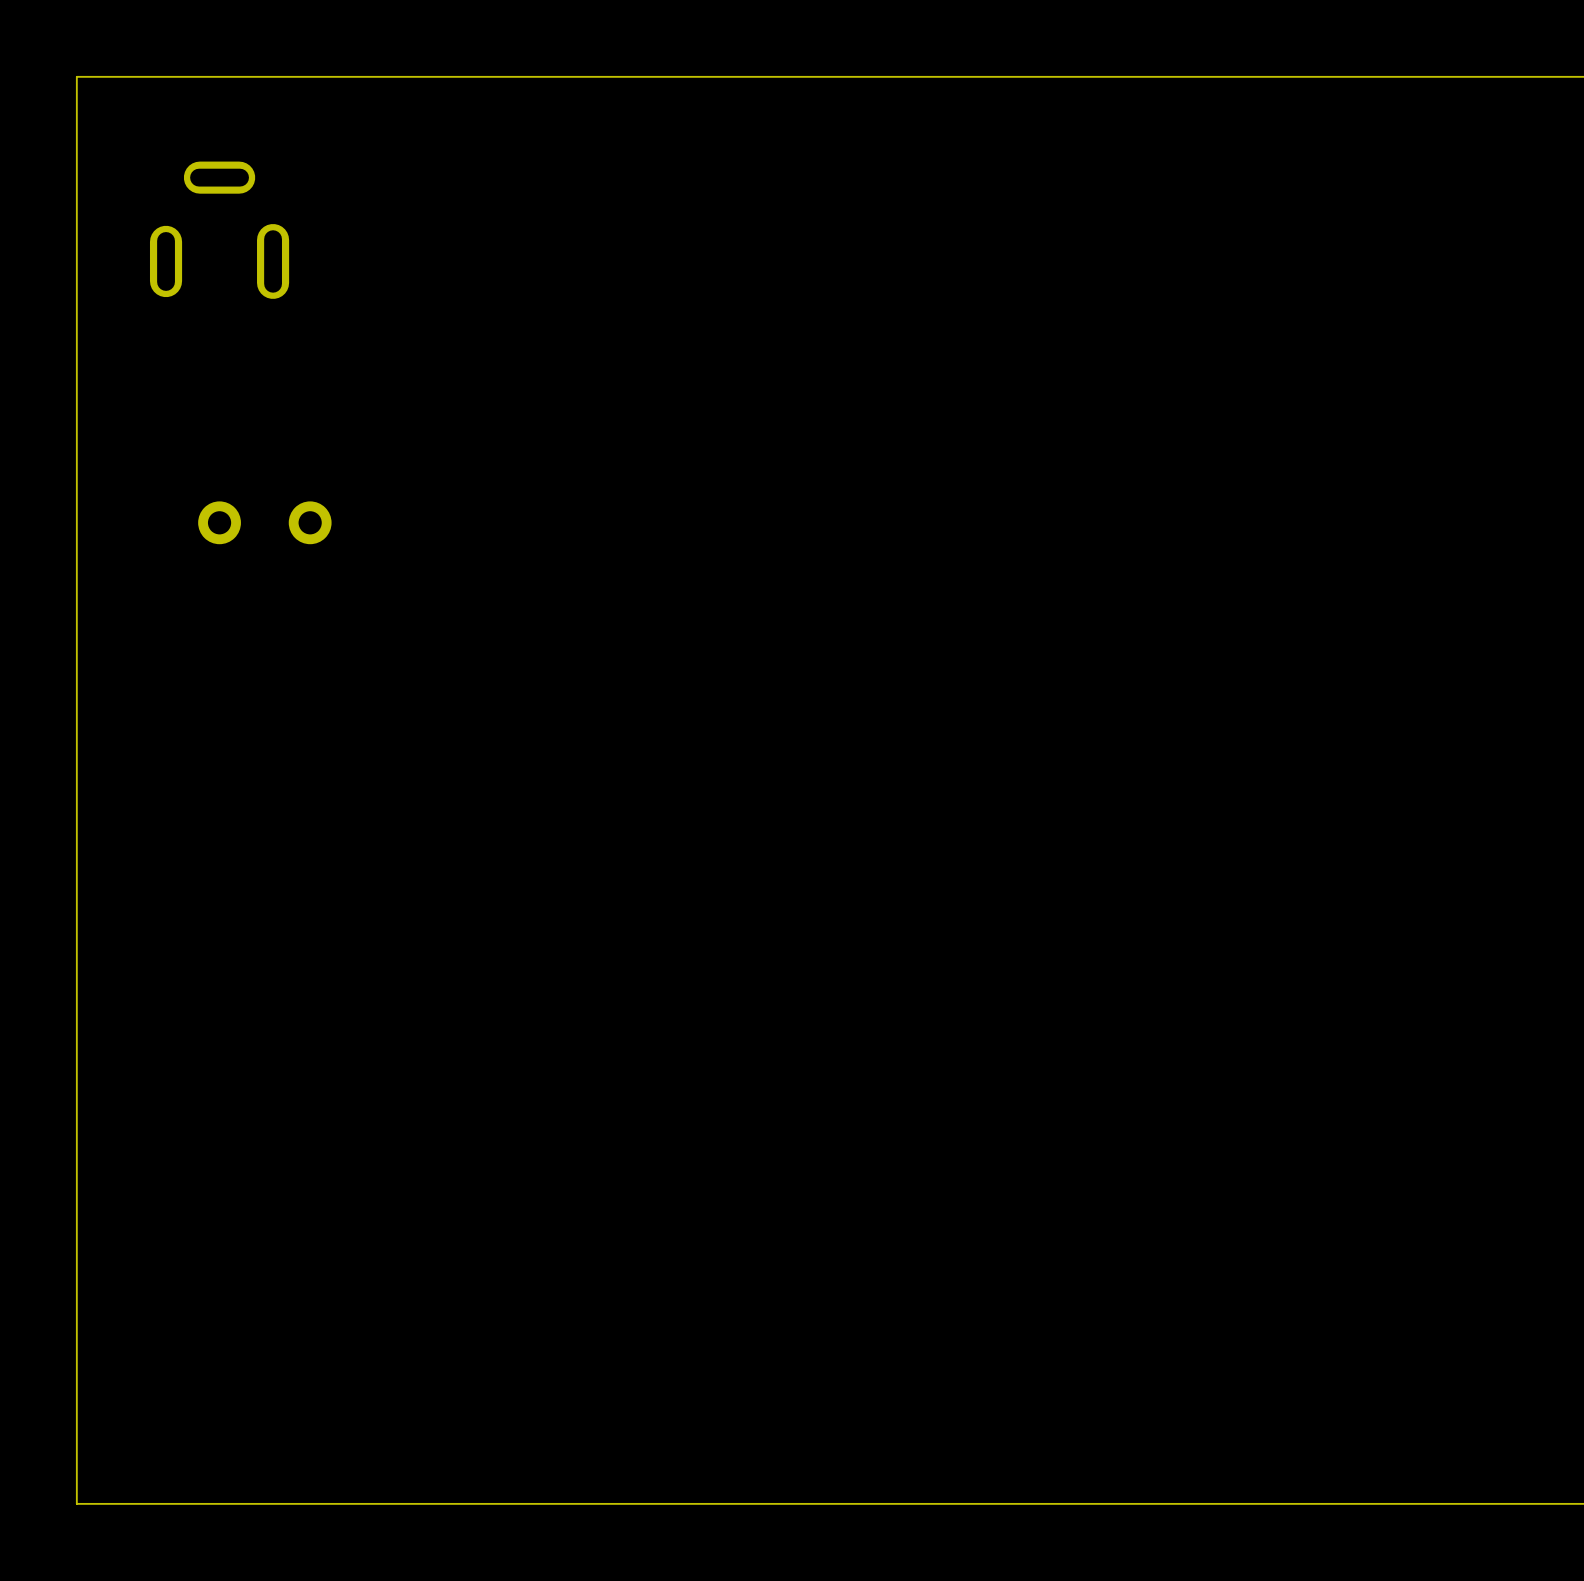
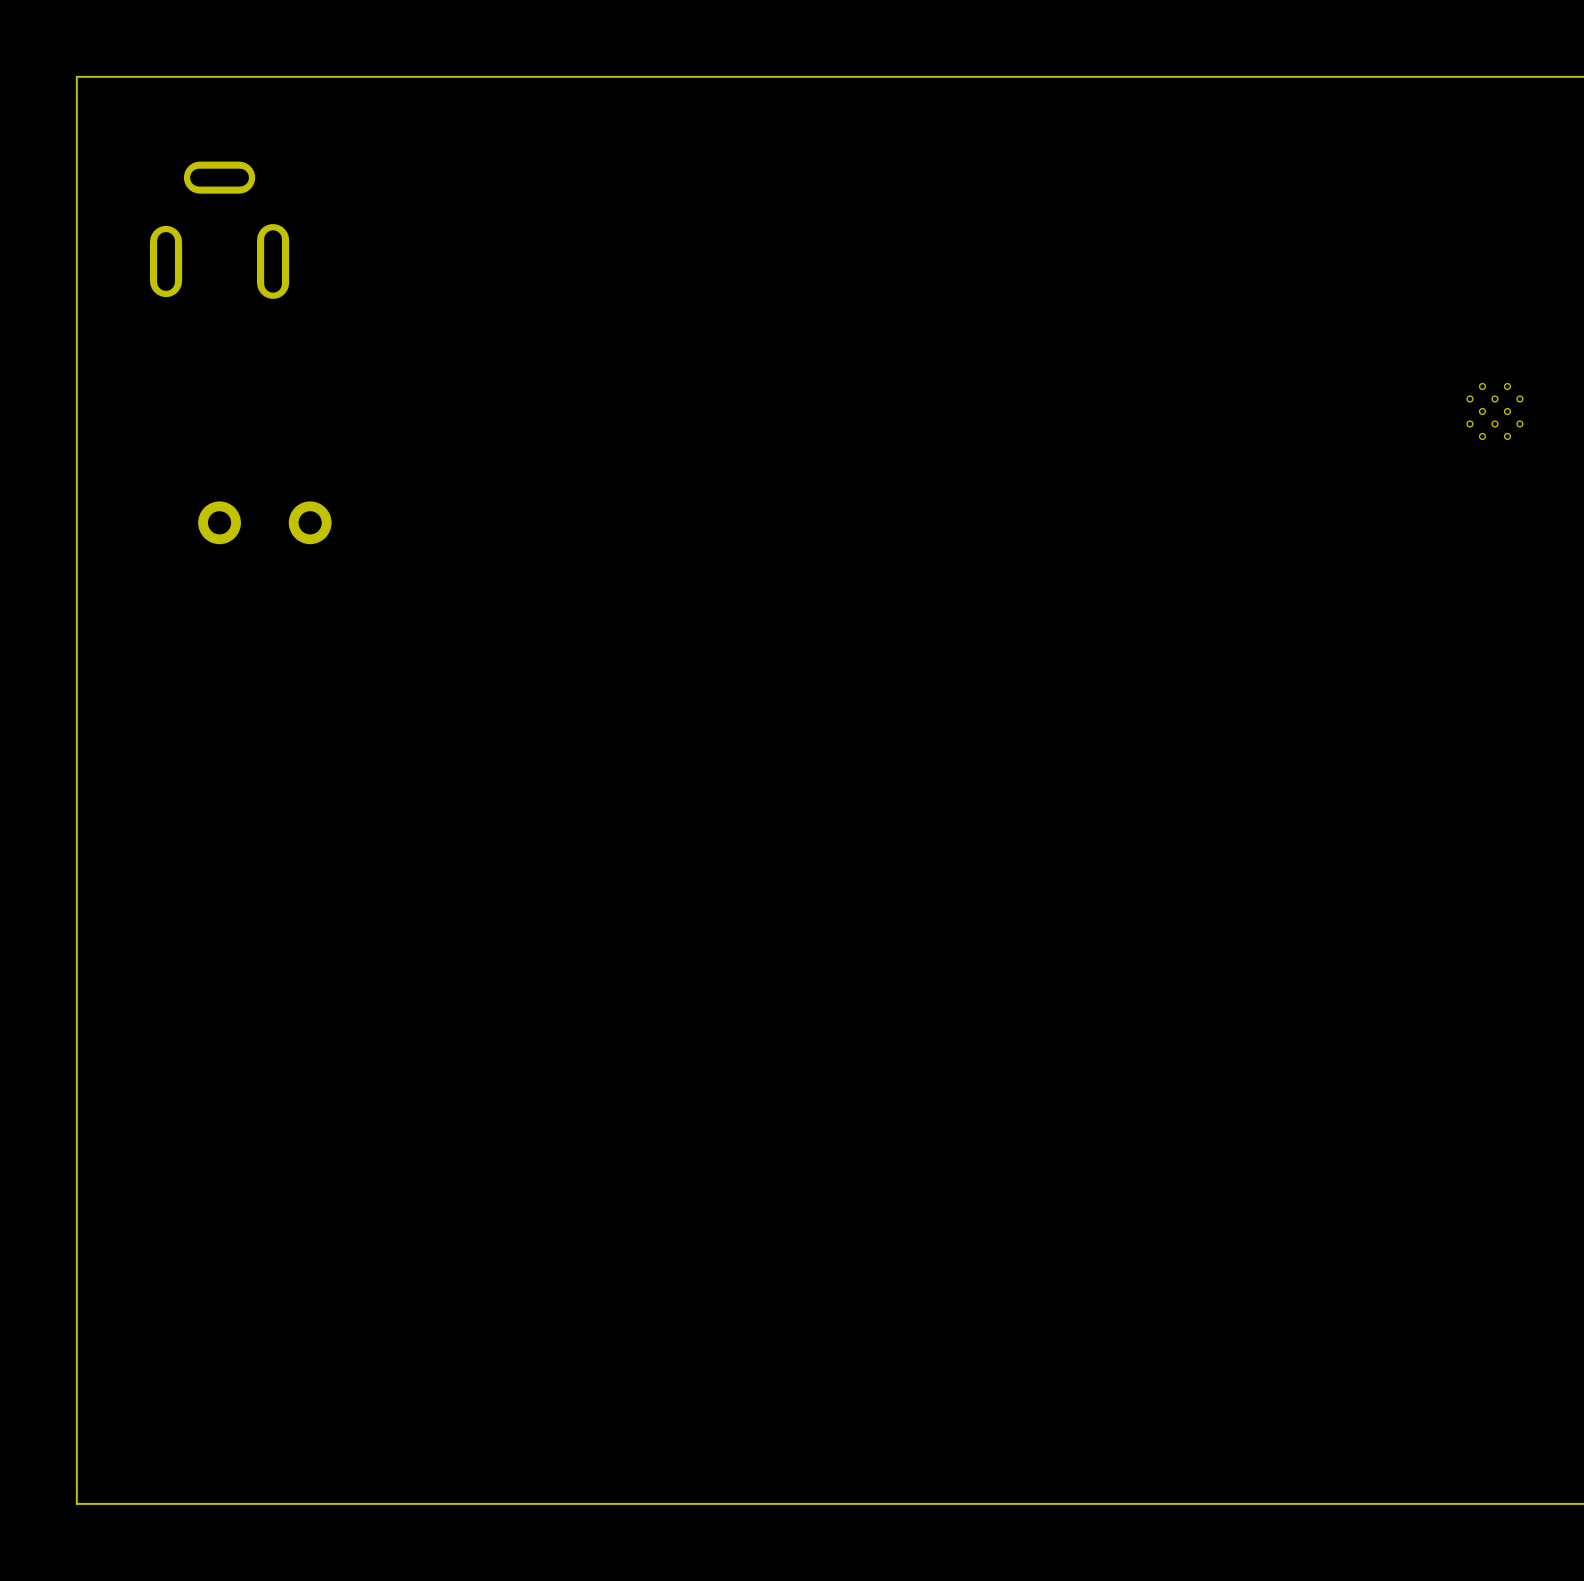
part: none -> (1494, 411)

